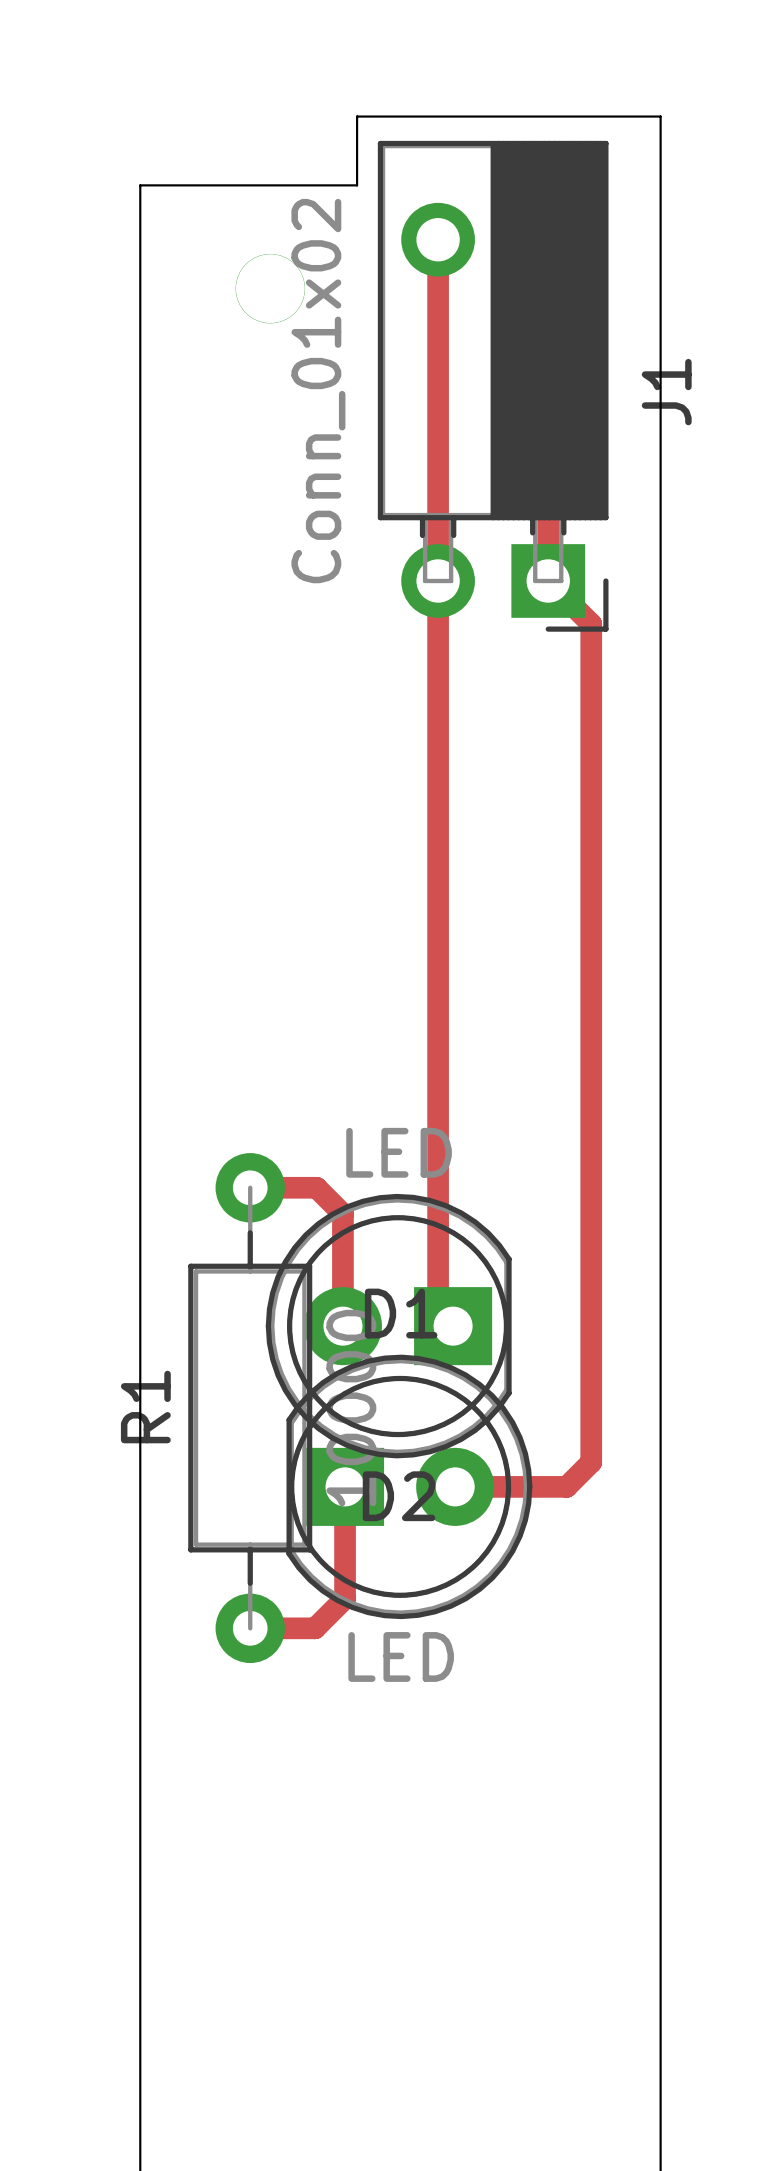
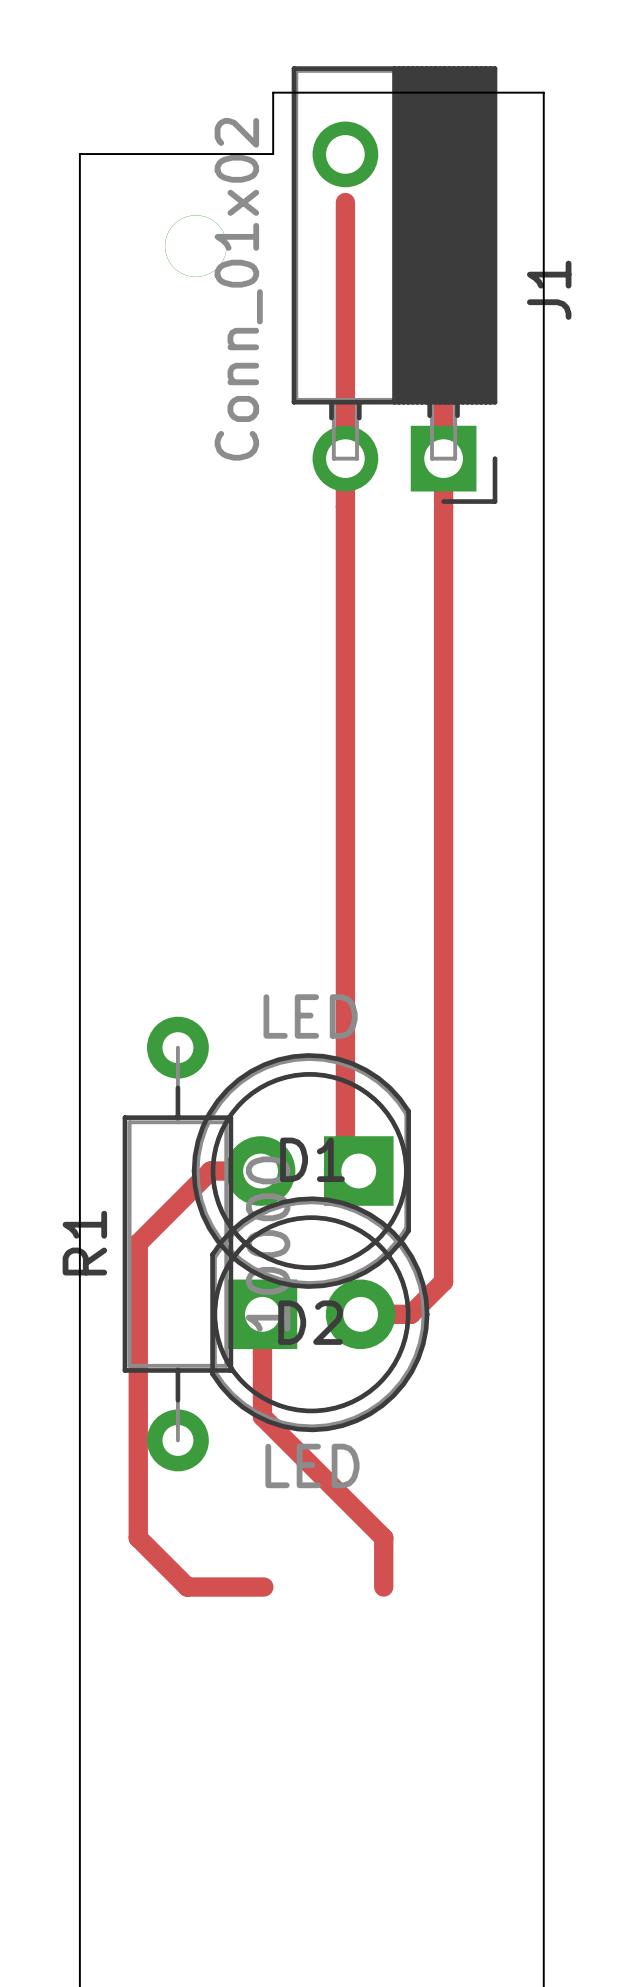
J1 position: (493, 386) -> (394, 285)
track: (548, 580) (591, 623) (591, 1462) (566, 1486) (511, 1486) -> (443, 506) (443, 1281) (410, 1314)
track: (250, 1187) (316, 1187) (342, 1214) (342, 1326) -> (263, 1587) (187, 1587) (138, 1537) (138, 1243) (210, 1171) (260, 1171)
track: (345, 1598) (315, 1628) (250, 1628) -> (262, 1413) (262, 1416) (383, 1537) (383, 1587)

